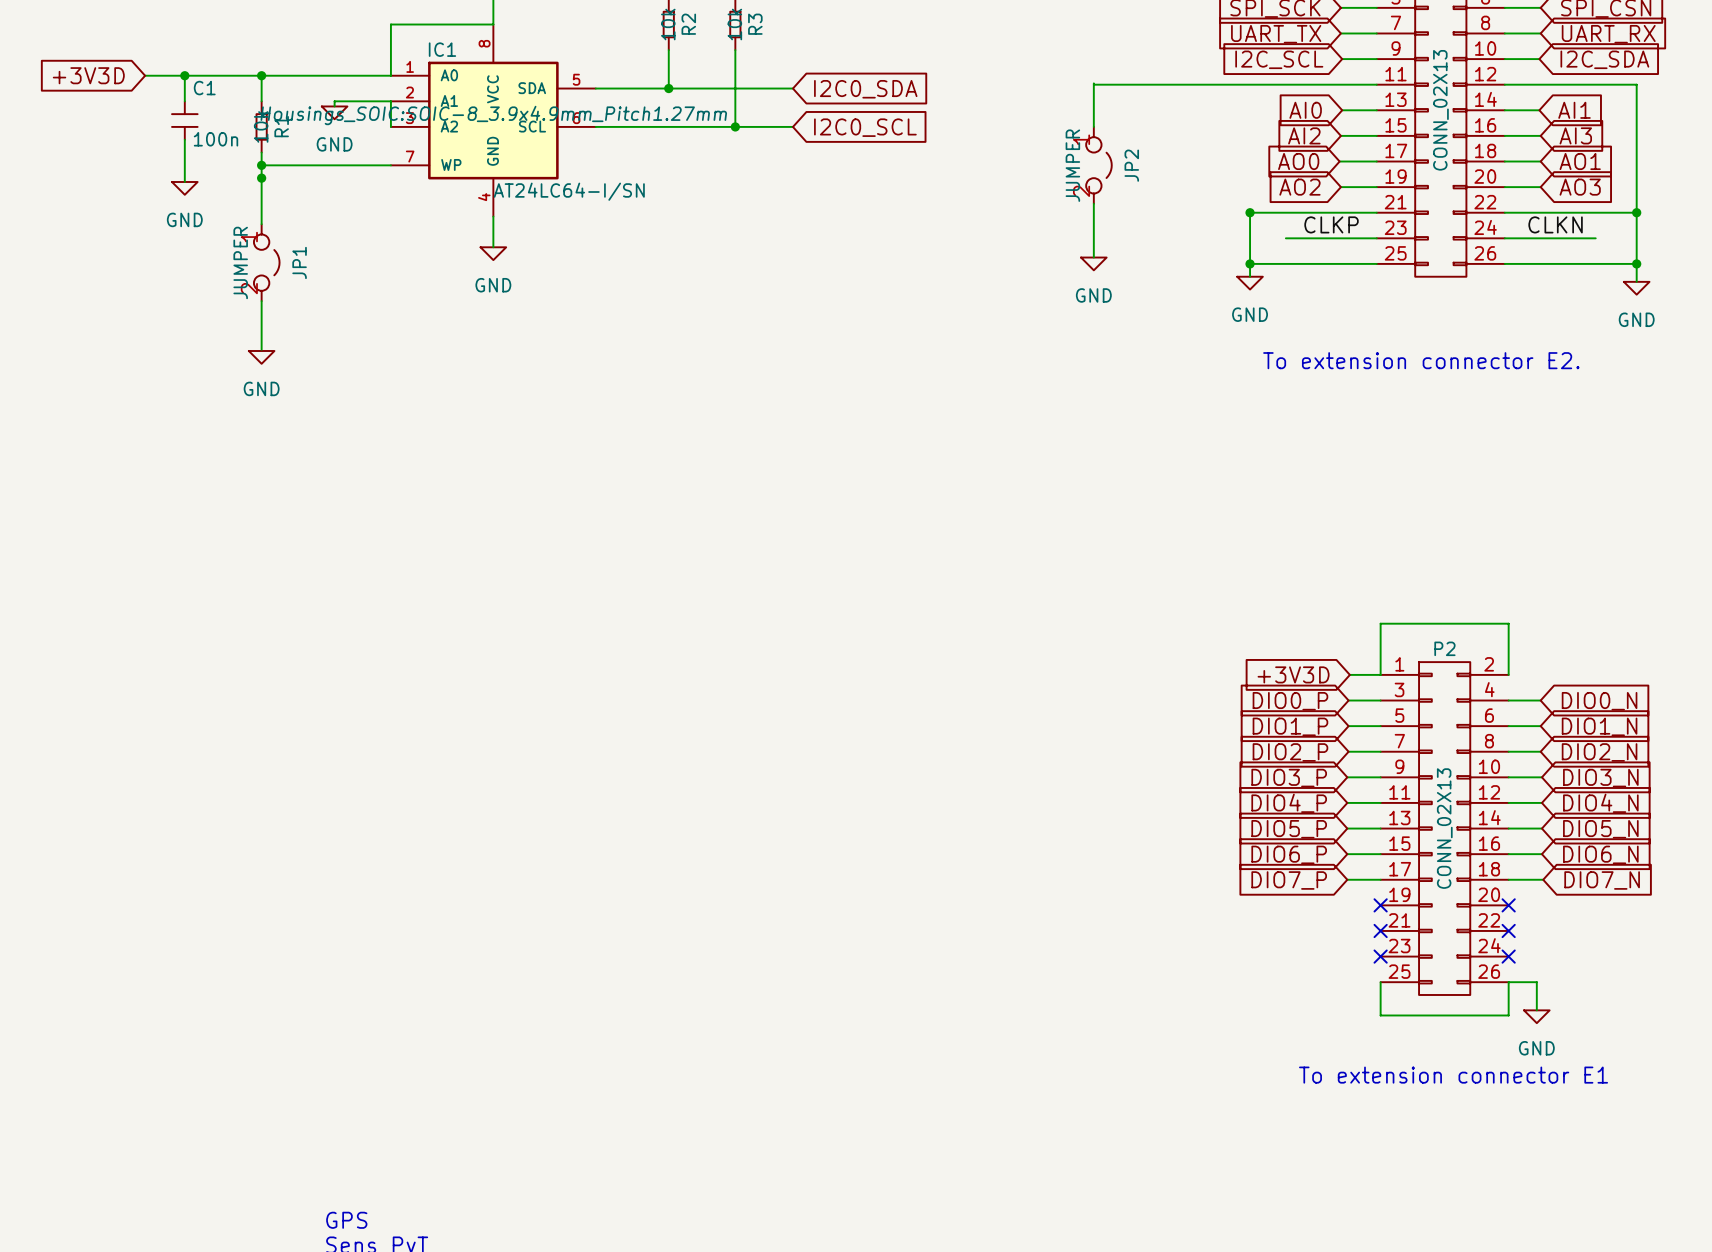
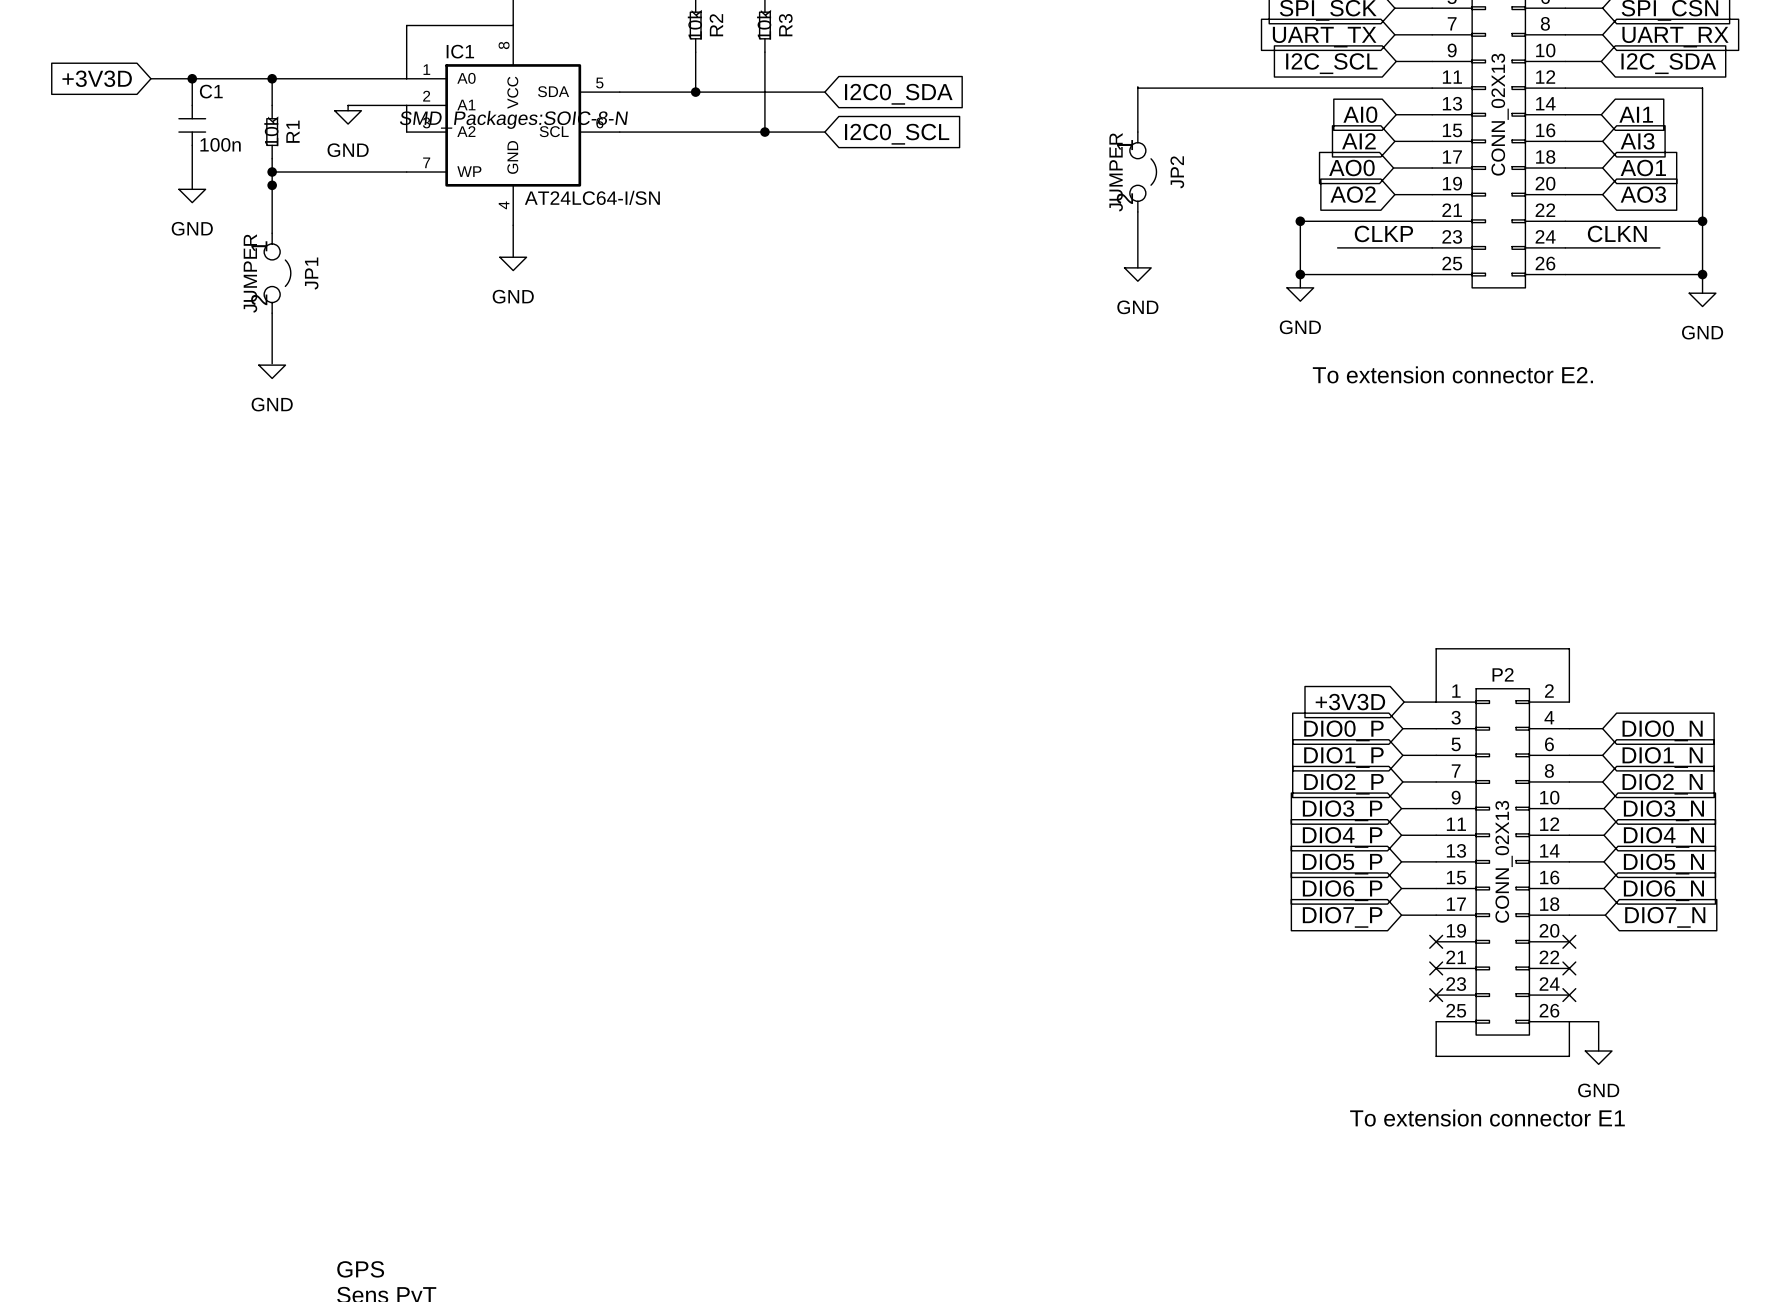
IC1 text: Housings_SOIC:SOIC-8_3.9x4.9mm_Pitch1.27mm (493, 115) -> SMD_Packages:SOIC-8-N (513, 119)

